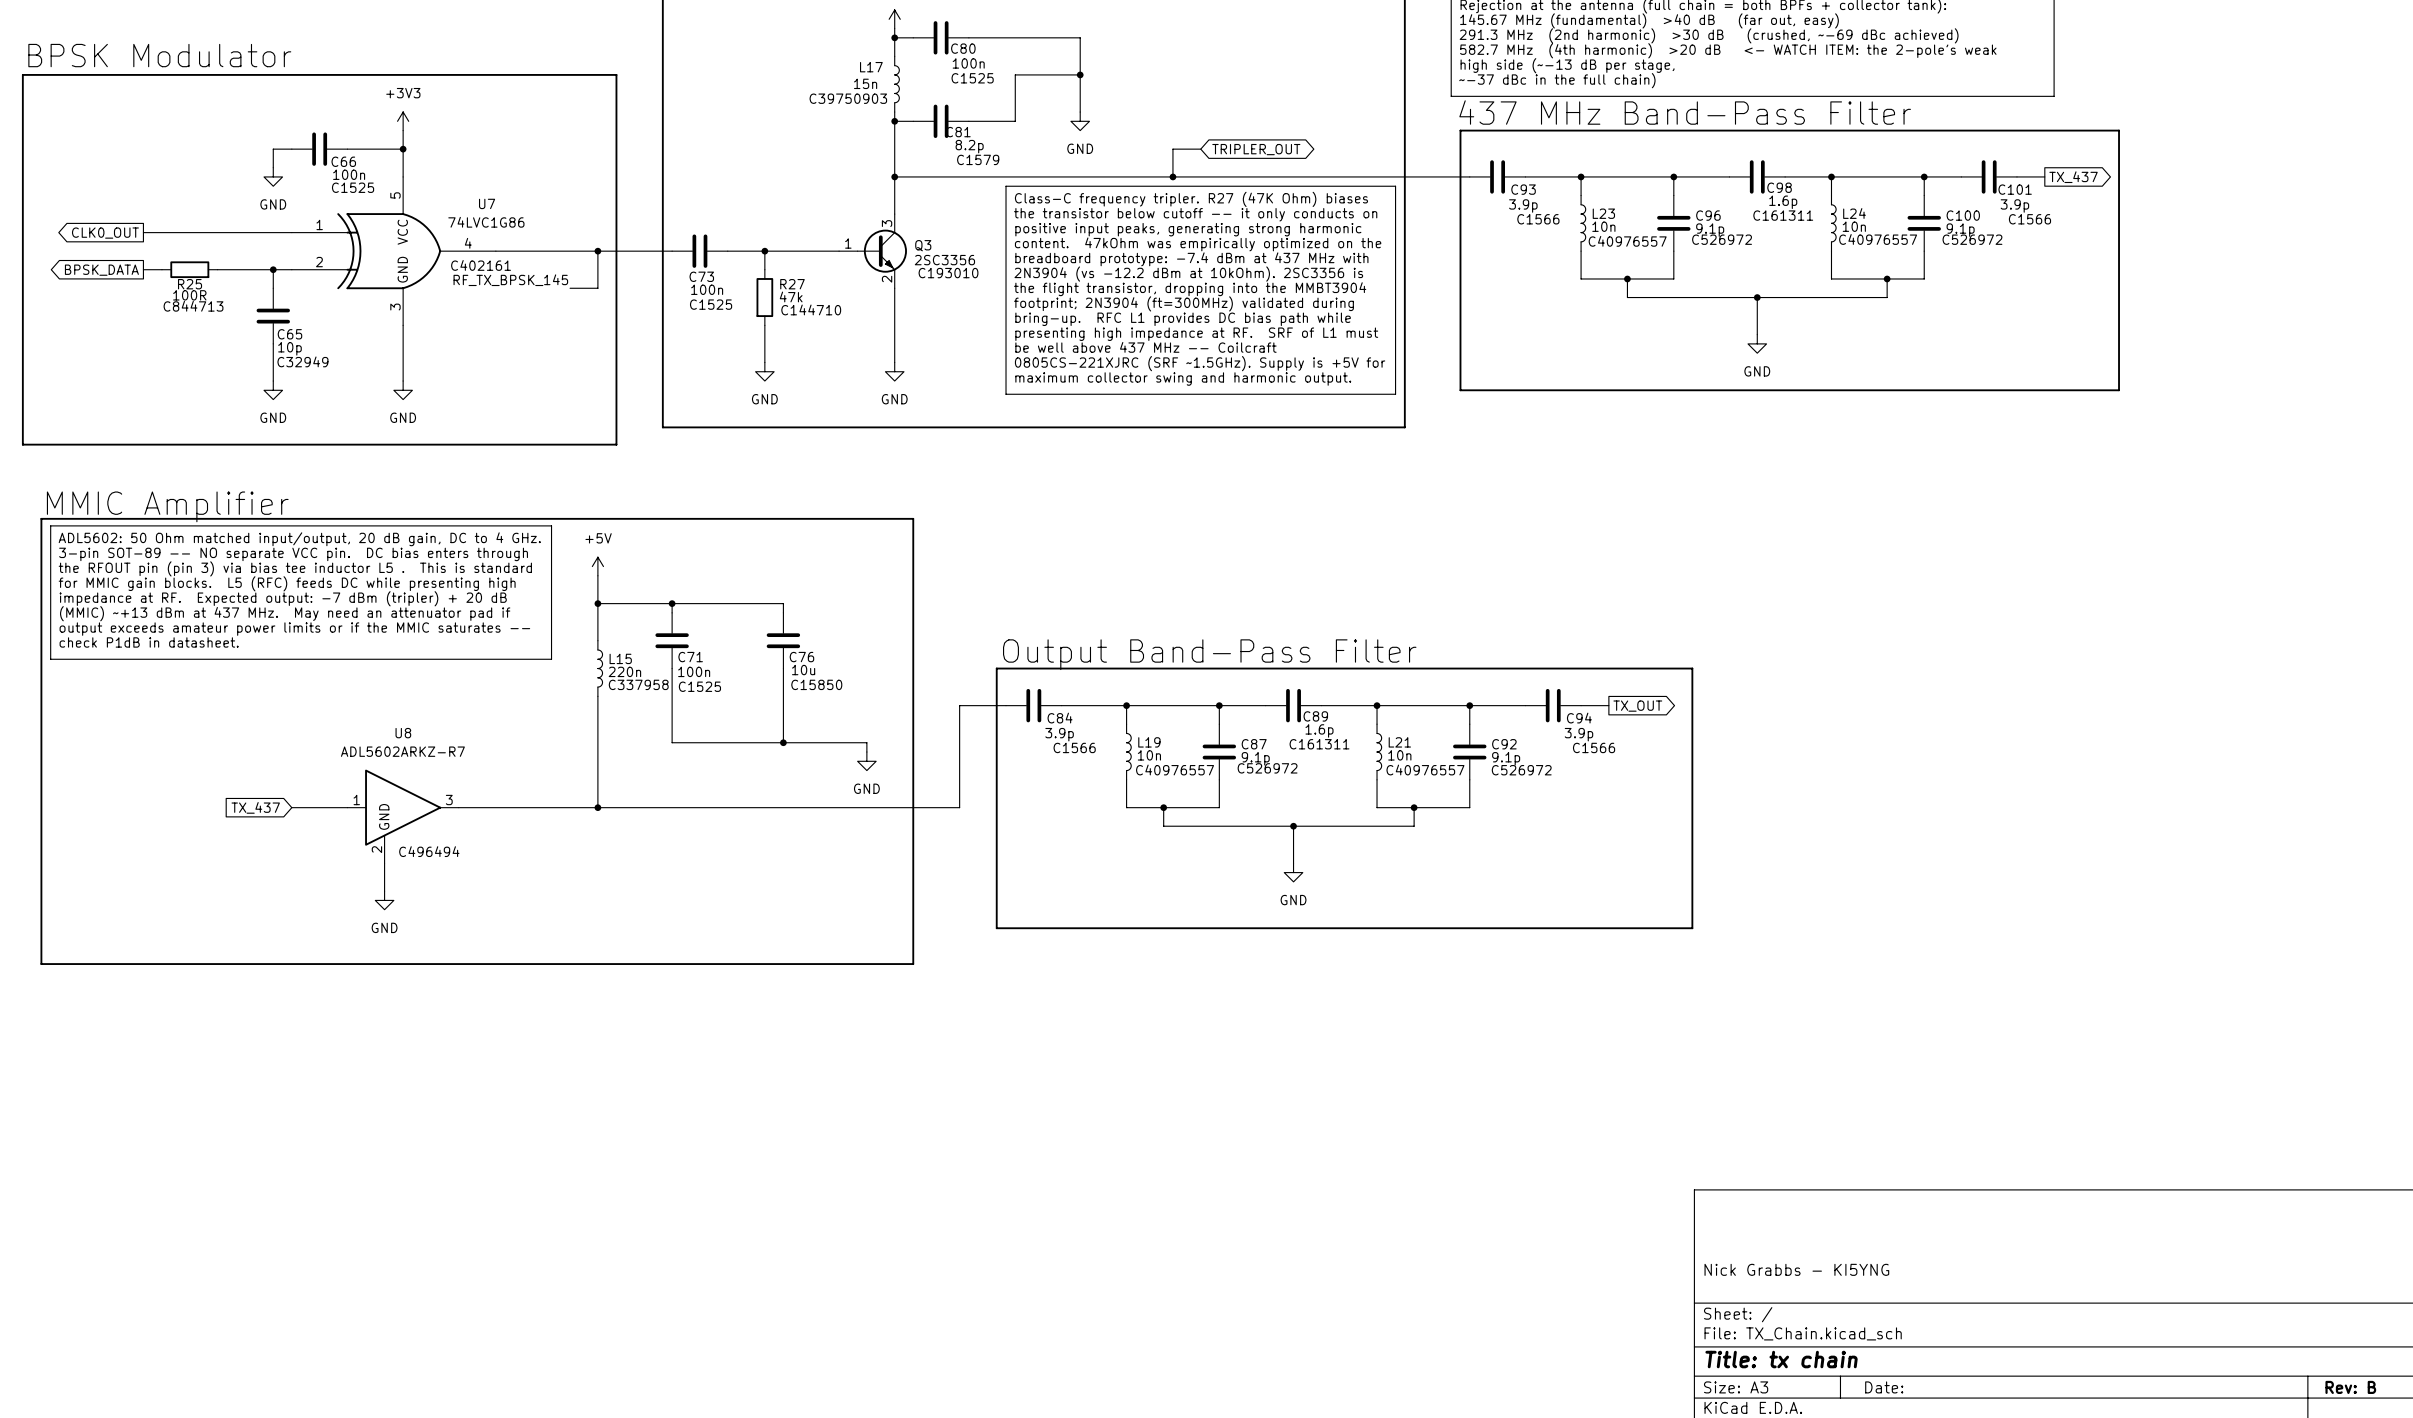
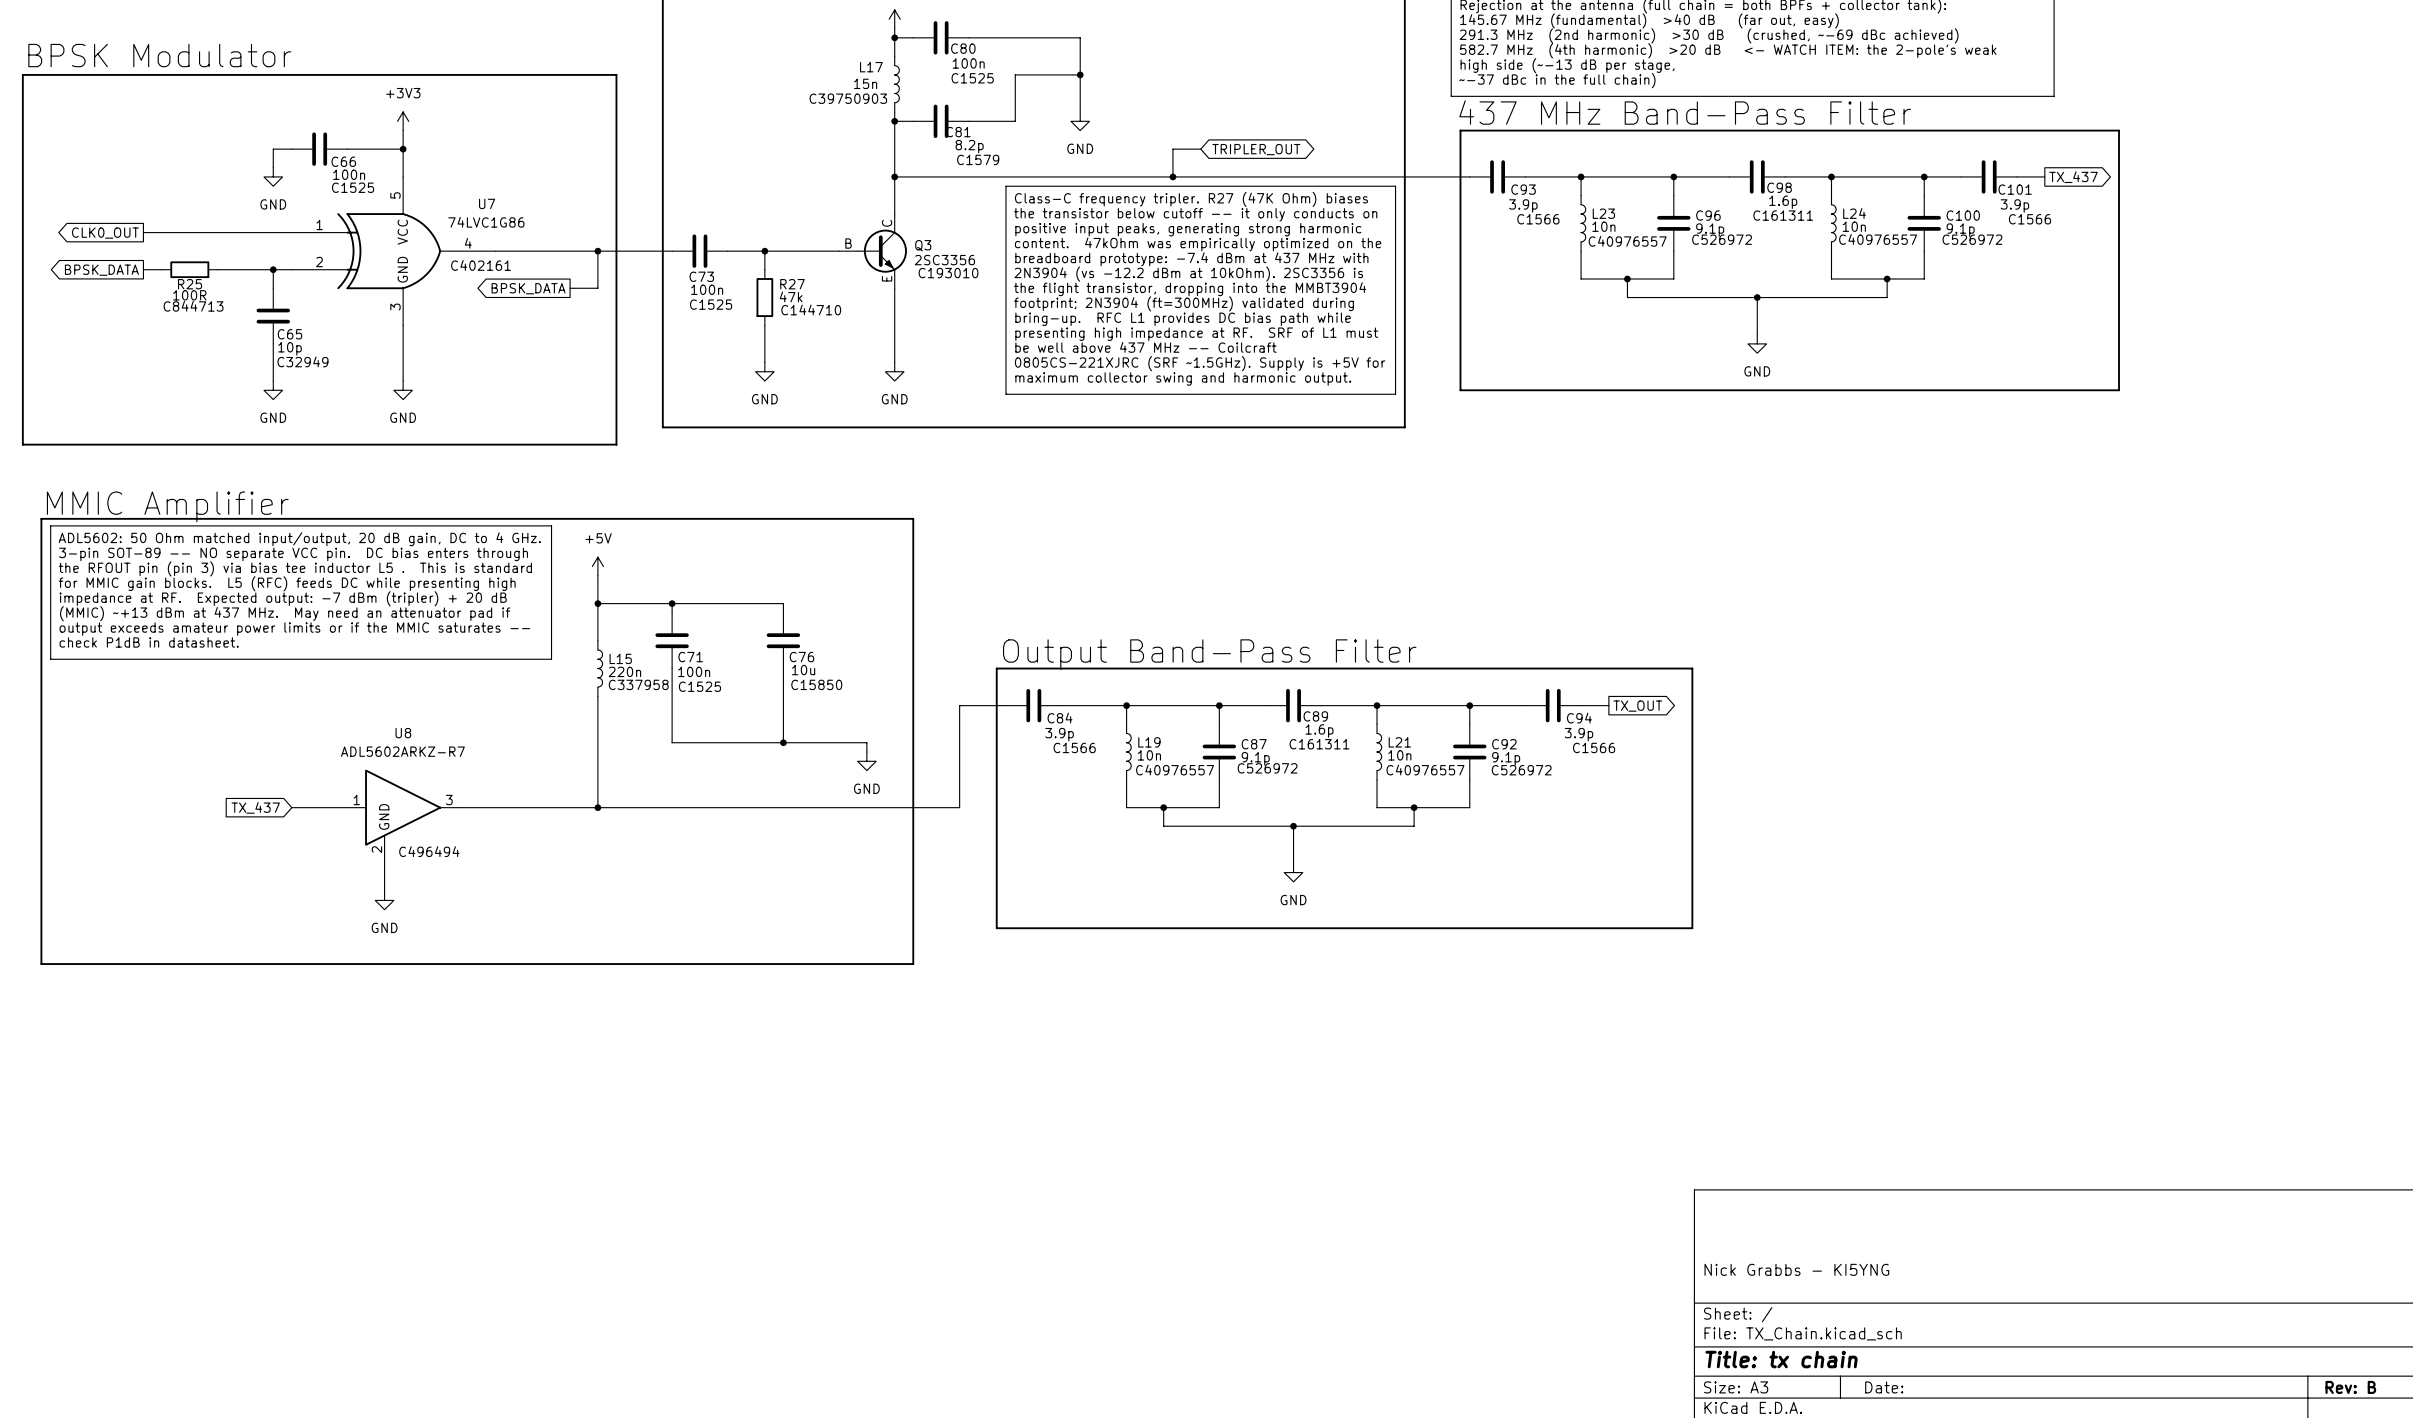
Q3 symbol: [839, 214, 907, 289] -> [839, 214, 907, 289]
label: RF_TX_BPSK_145 (510, 280) -> none
global label: none -> BPSK_DATA (528, 288)

